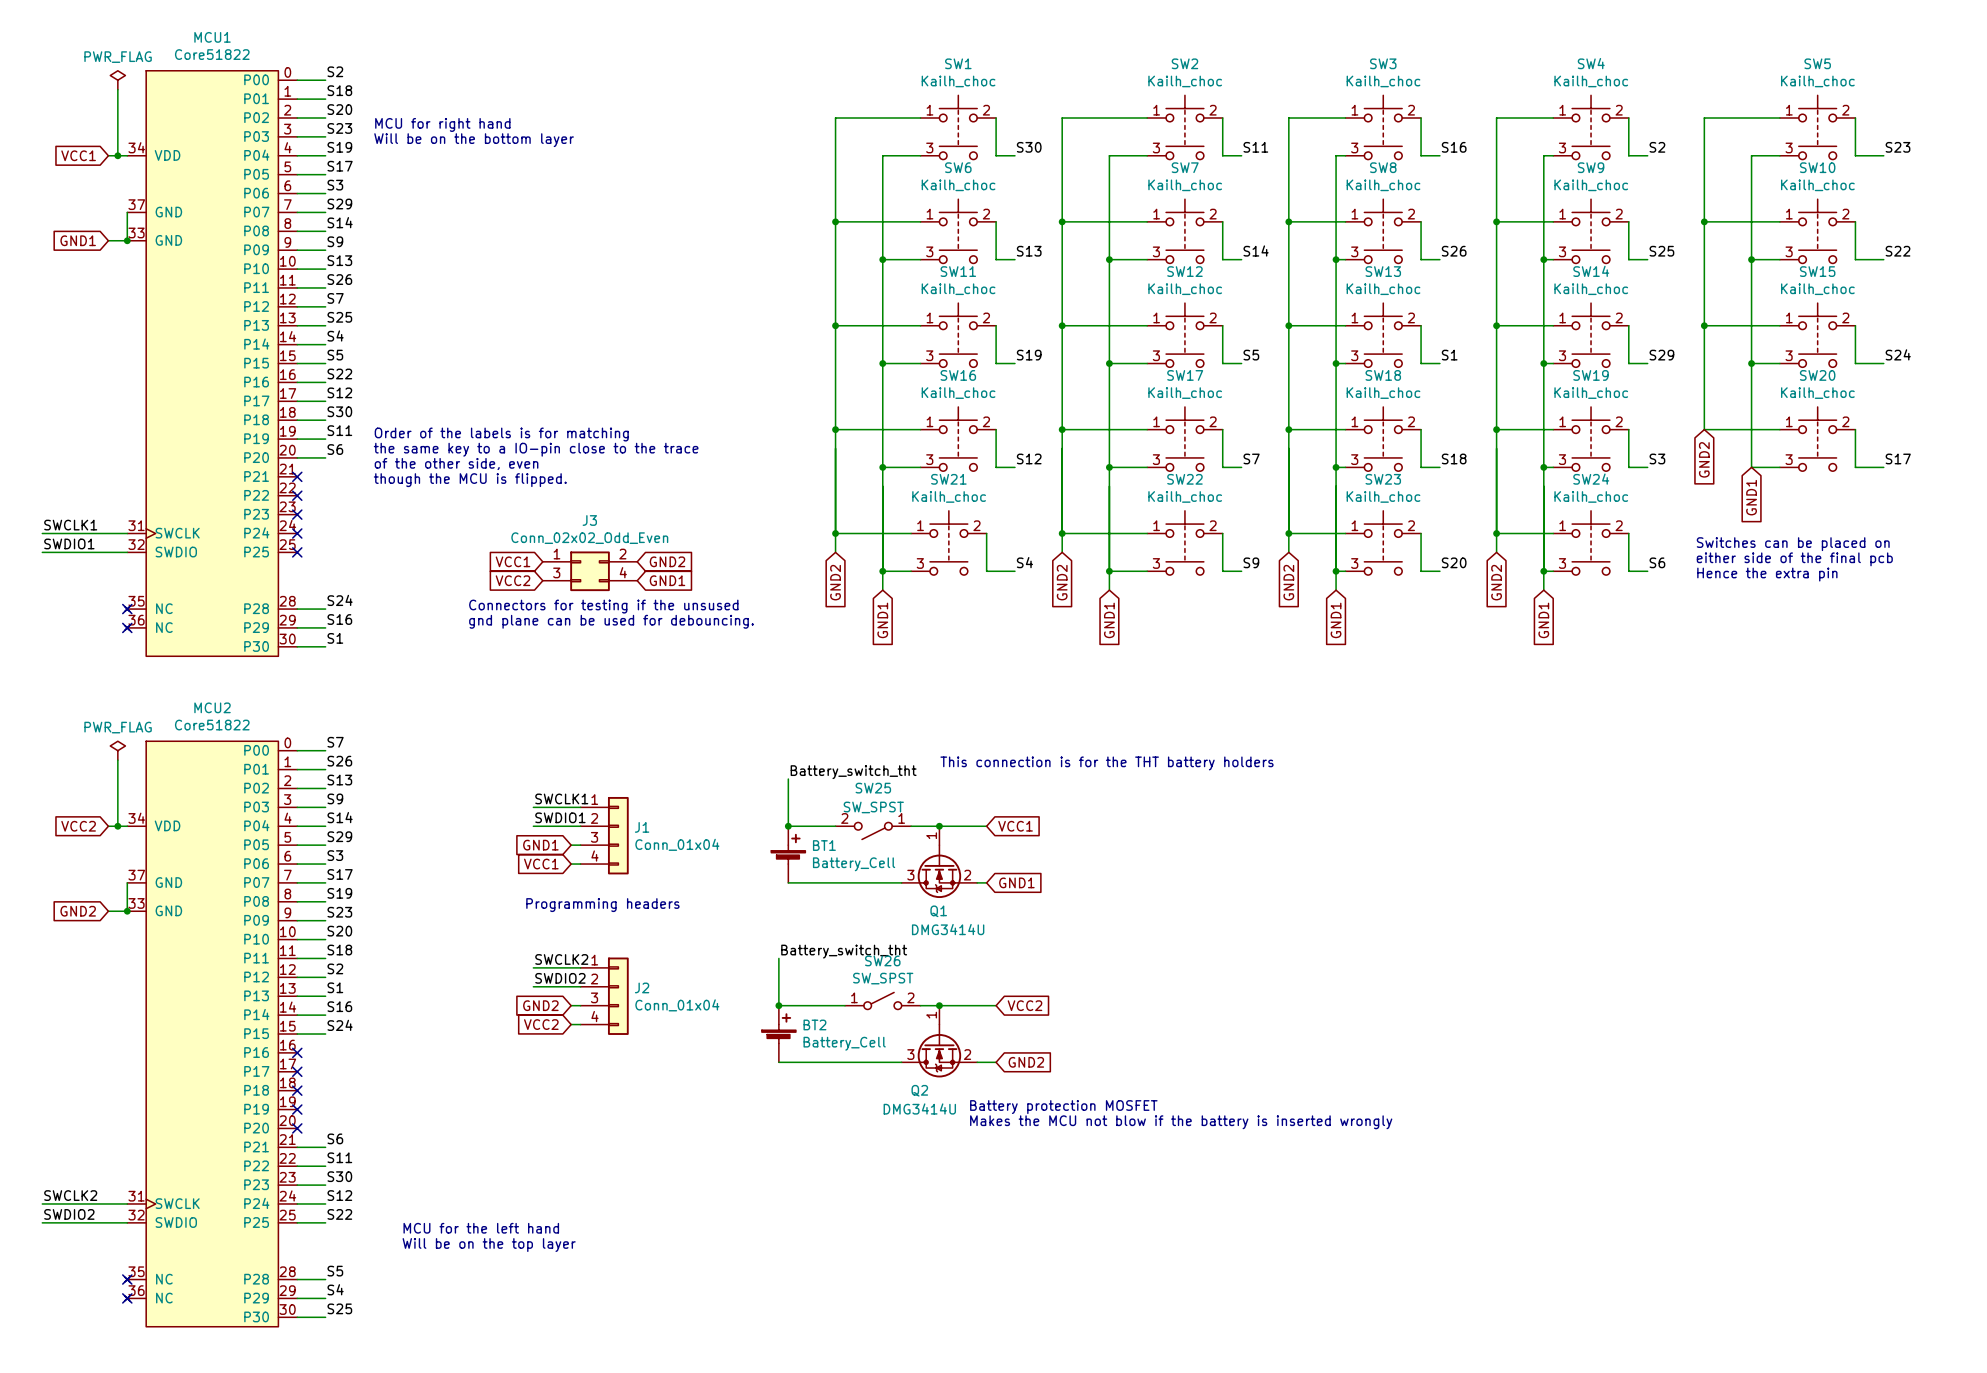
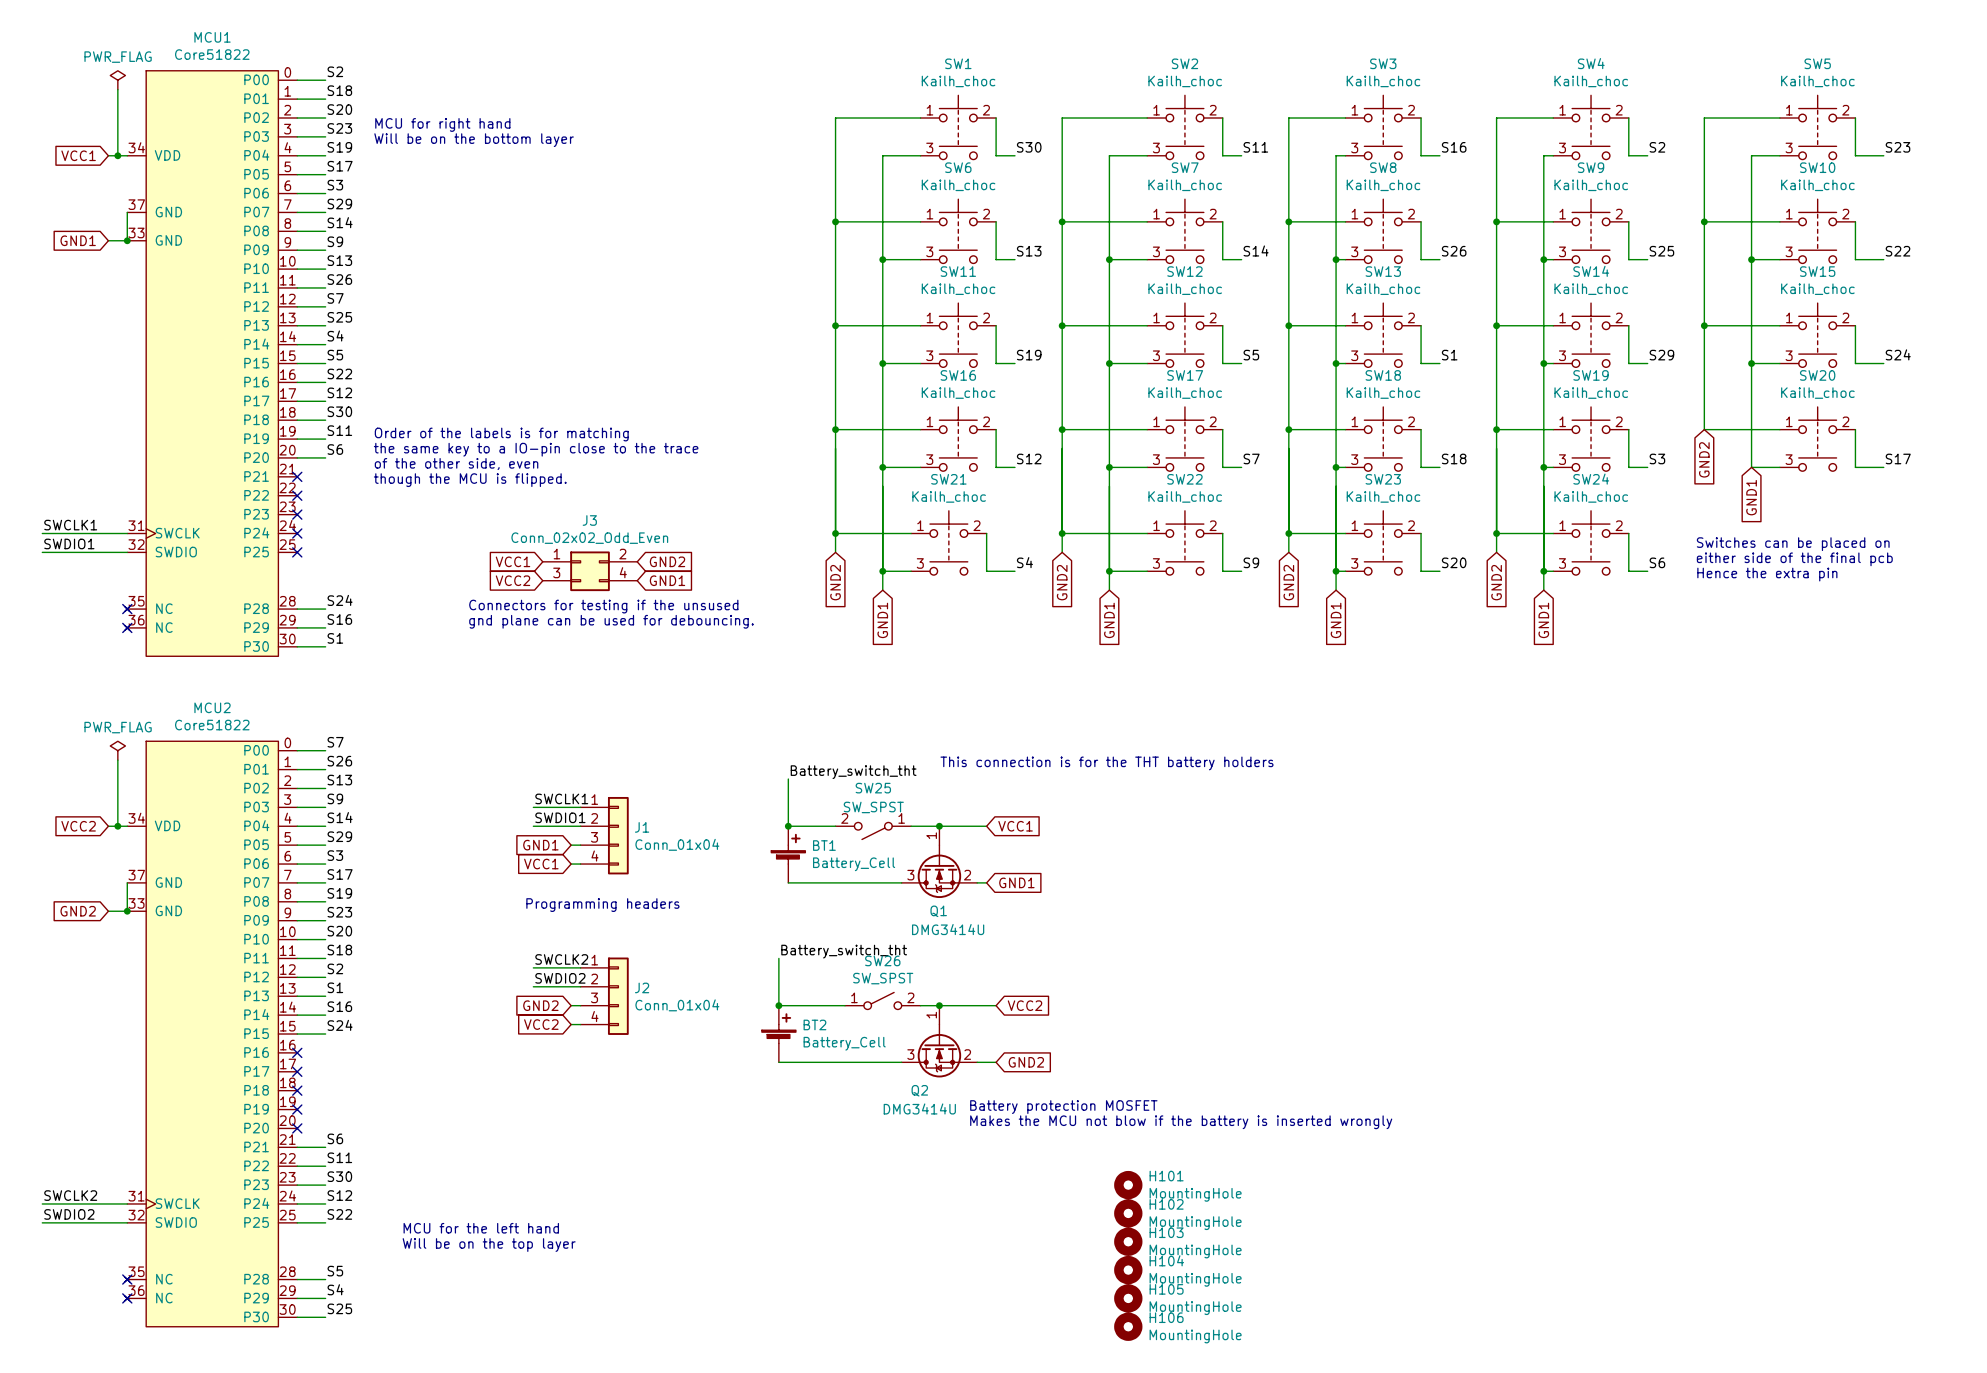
H101: none -> MountingHole (1128, 1185)
H102: none -> MountingHole (1128, 1213)
H103: none -> MountingHole (1128, 1241)
H104: none -> MountingHole (1128, 1270)
H105: none -> MountingHole (1128, 1298)
H106: none -> MountingHole (1128, 1326)

